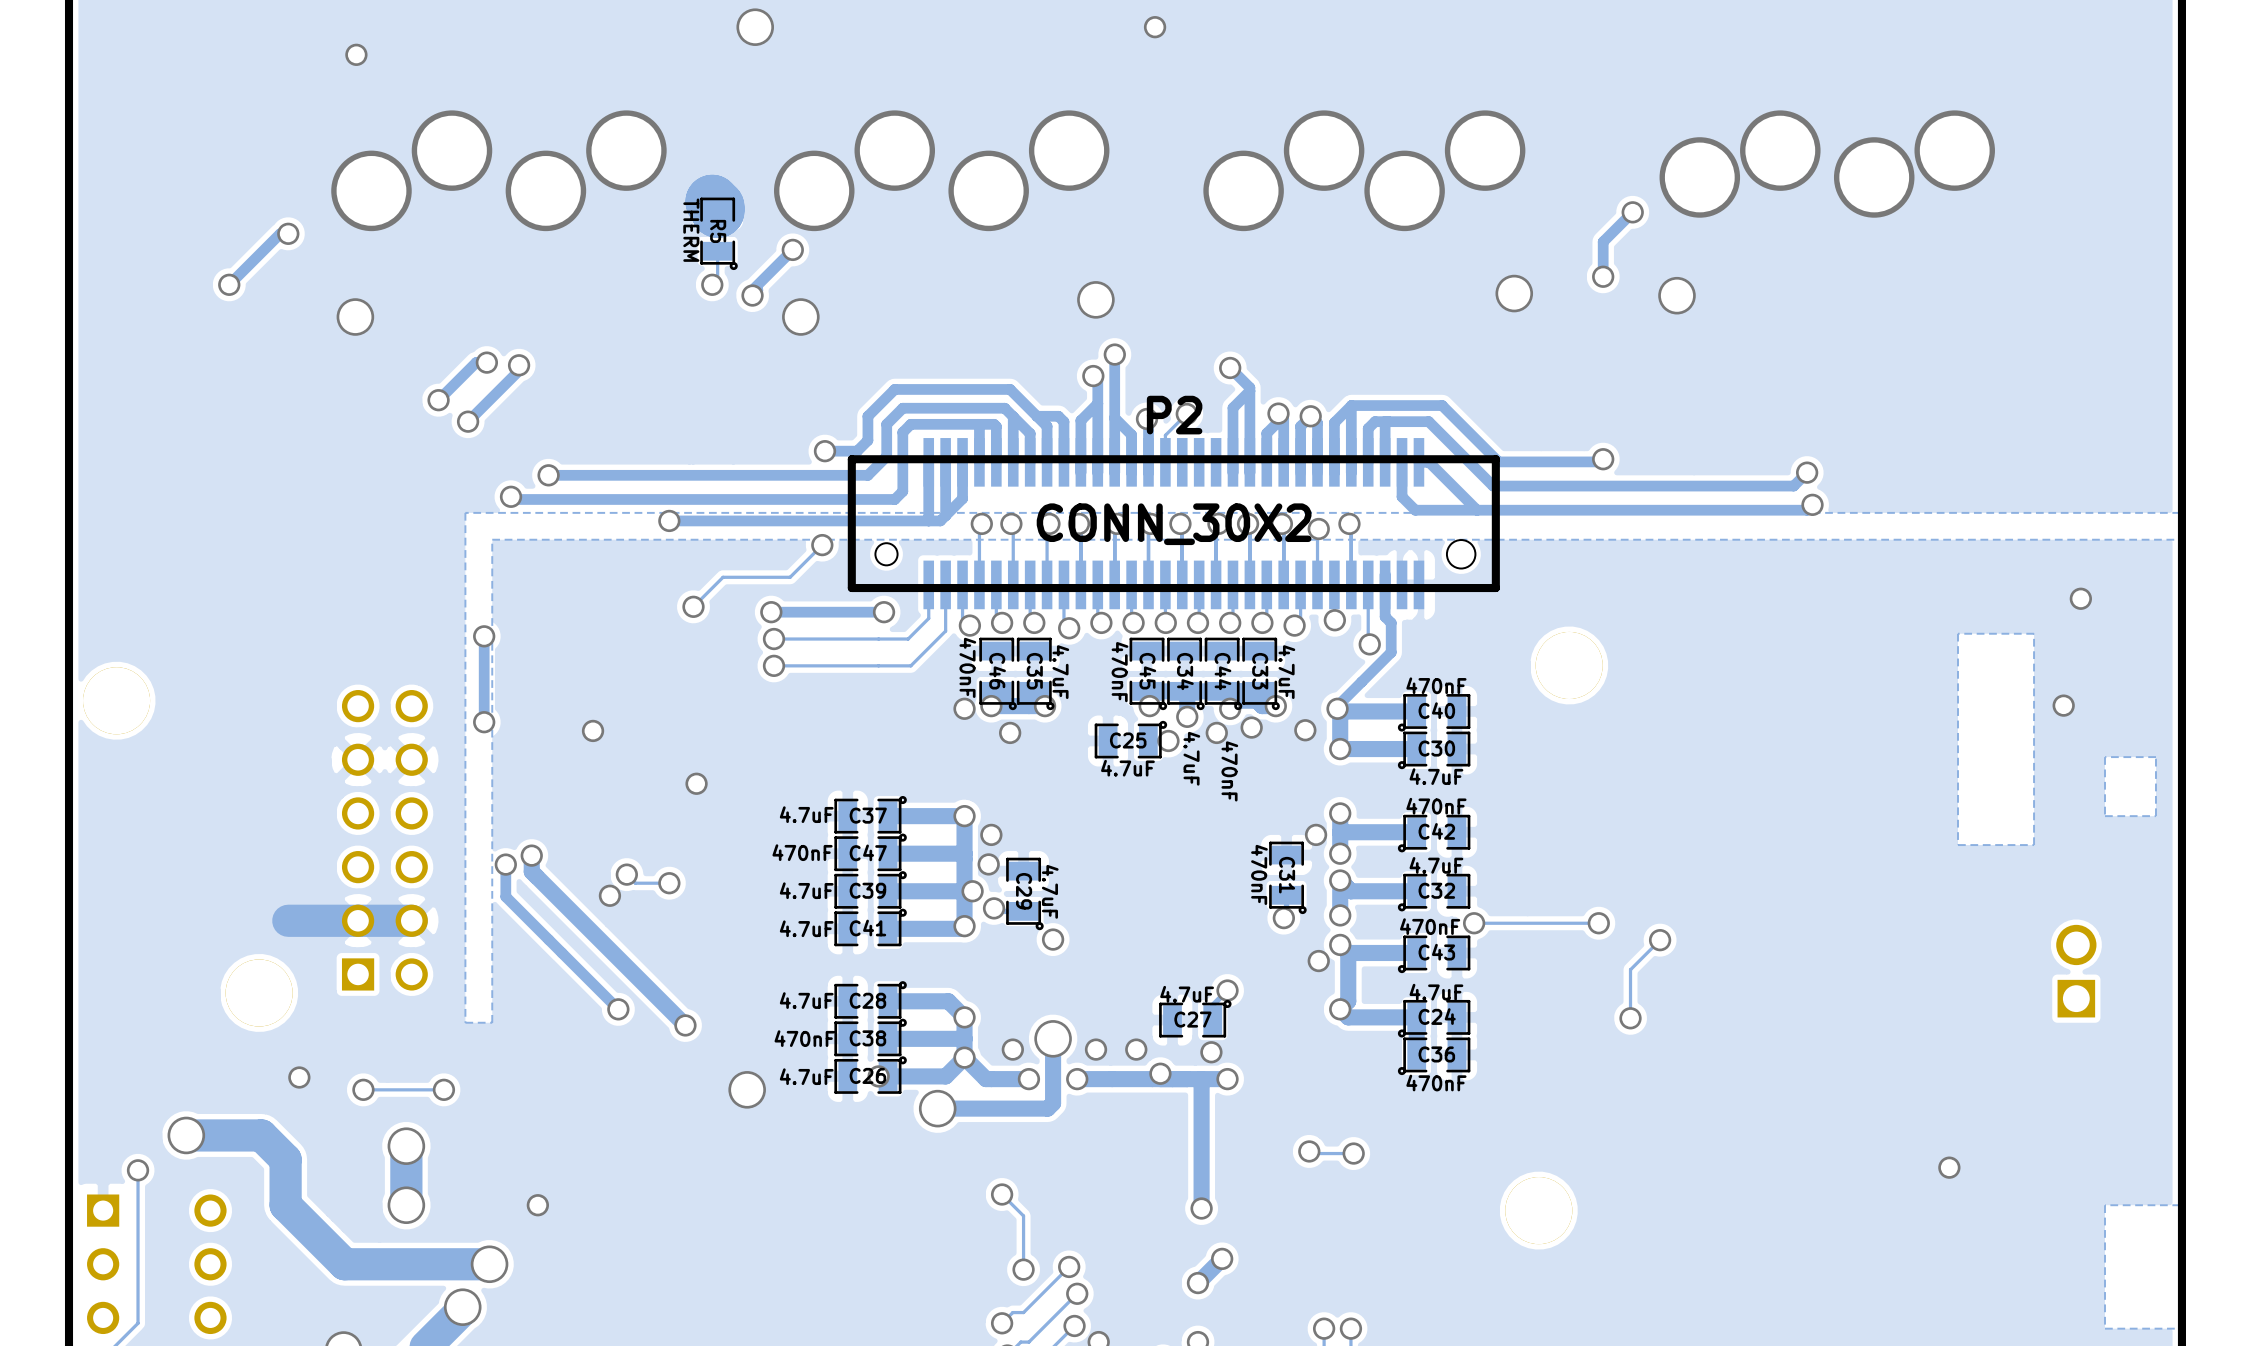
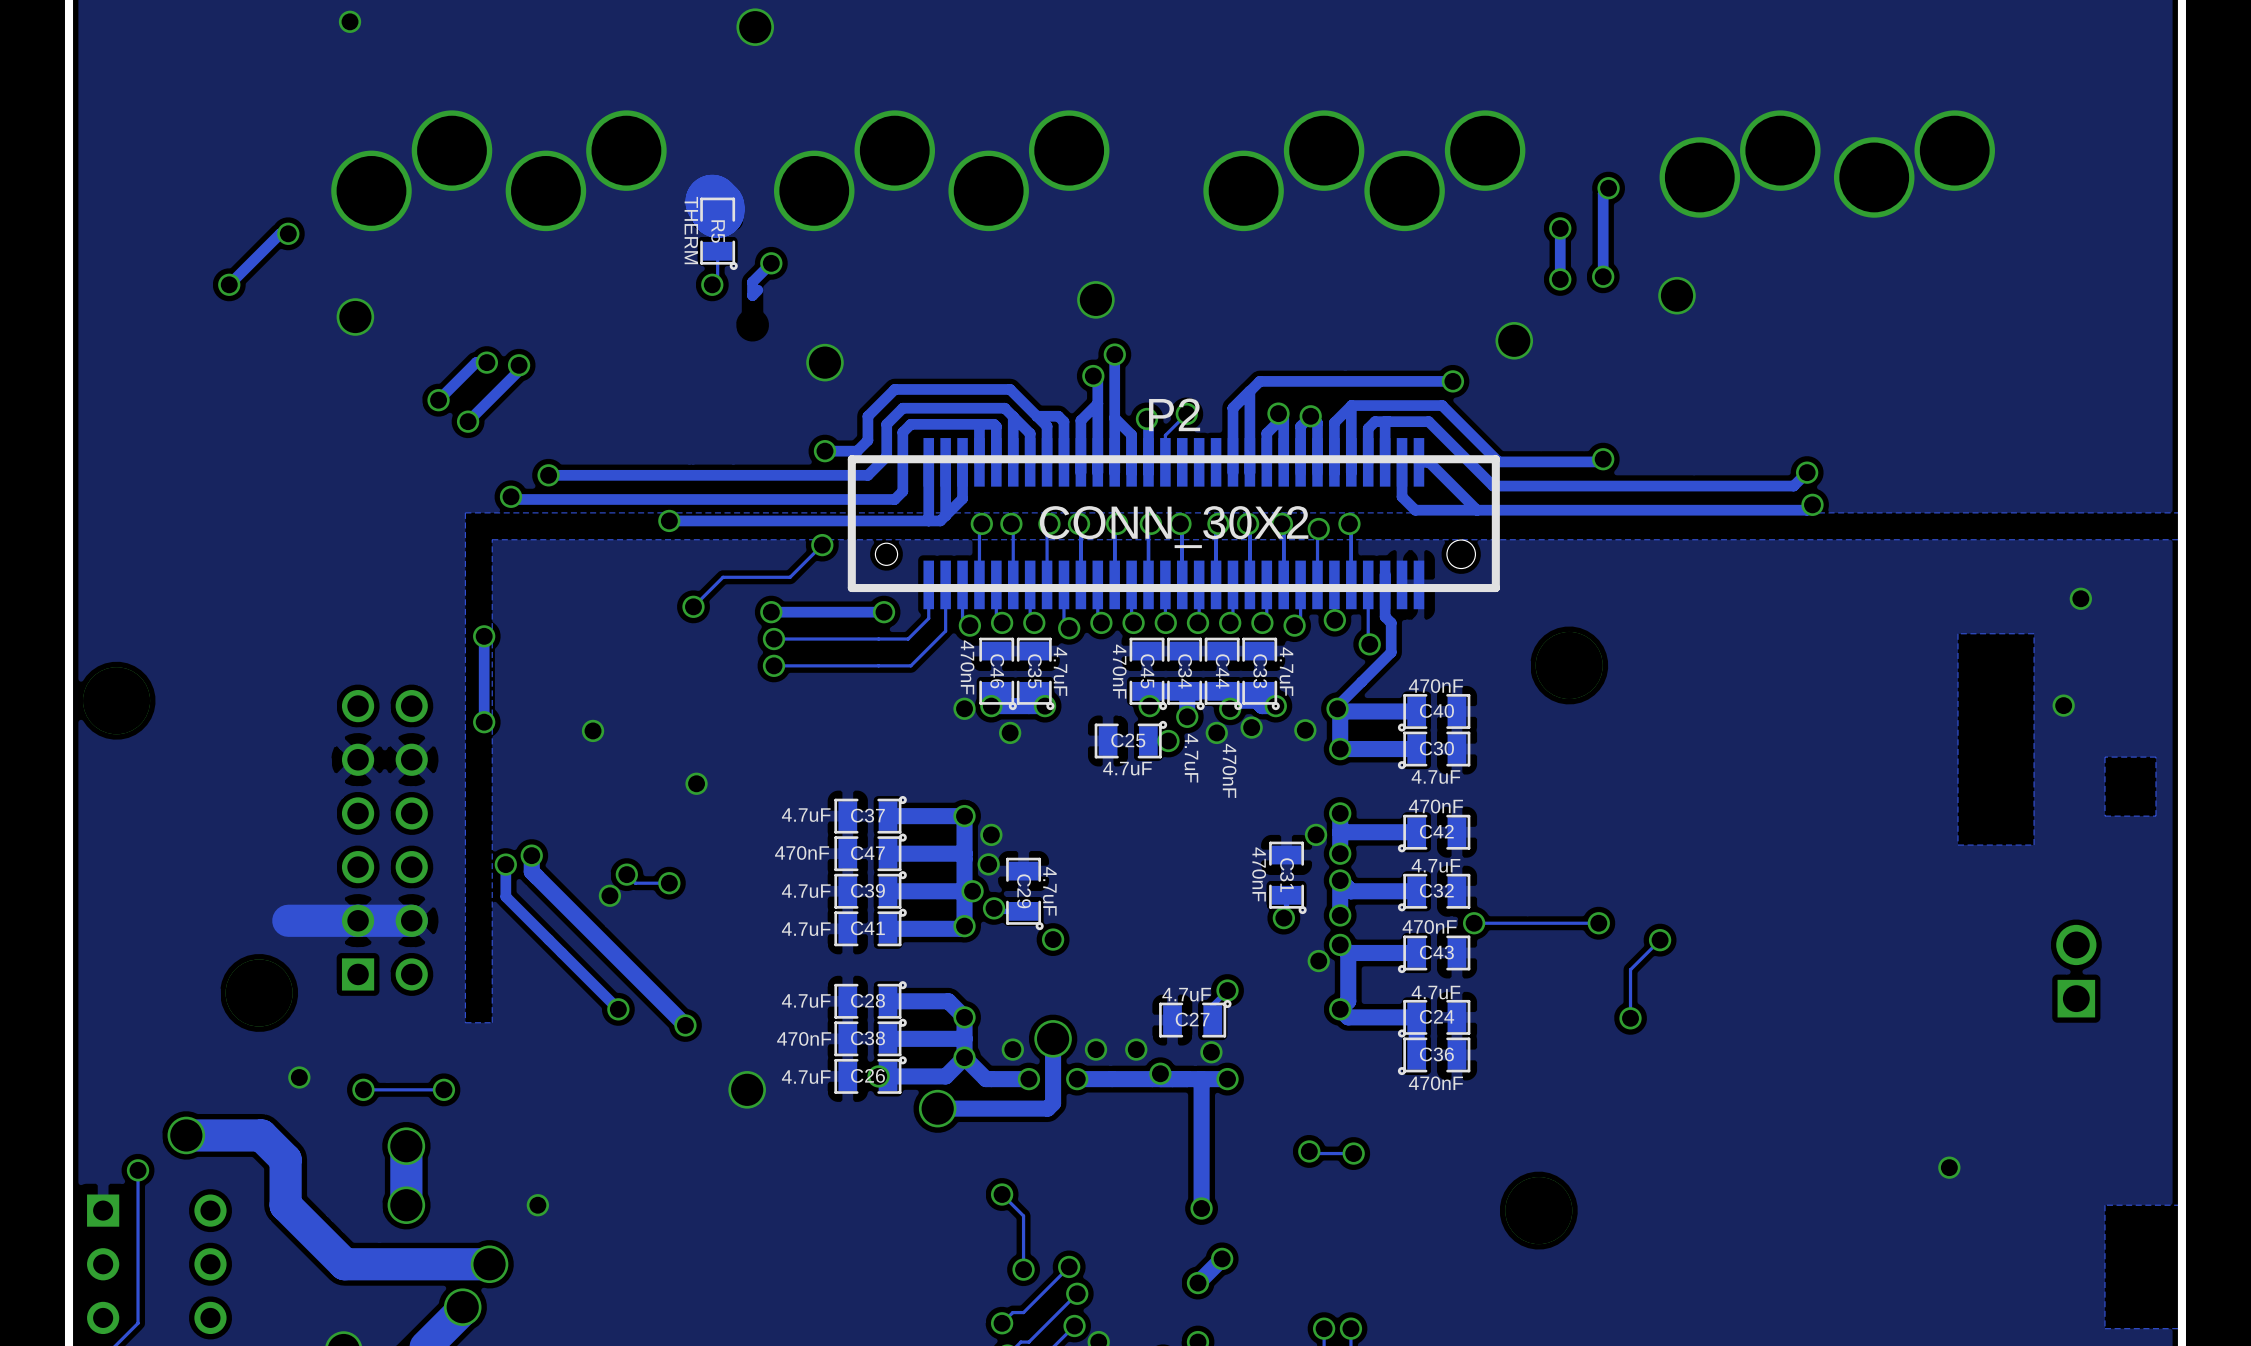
via: (1155, 27) -> none
via position: (356, 54) -> (350, 21)
track: (1632, 212) (1603, 241) -> (1608, 188) (1603, 193) (1603, 241)
via position: (1632, 212) -> (1608, 188)
track: none -> (1560, 228) (1560, 279)
via: none -> (1560, 228)
track: (792, 249) (752, 290) -> (771, 263) (752, 282) (752, 290)
via: (792, 249) -> none
via: none -> (771, 263)
via: none -> (1560, 279)
via position: (1514, 293) -> (1514, 340)
via: (752, 295) -> none
via position: (800, 317) -> (824, 362)
track: (1230, 367) (1249, 387) (1249, 391) -> none
via: (1230, 367) -> none
track: none -> (1452, 381) (1259, 381) (1232, 408)
via: none -> (1452, 381)

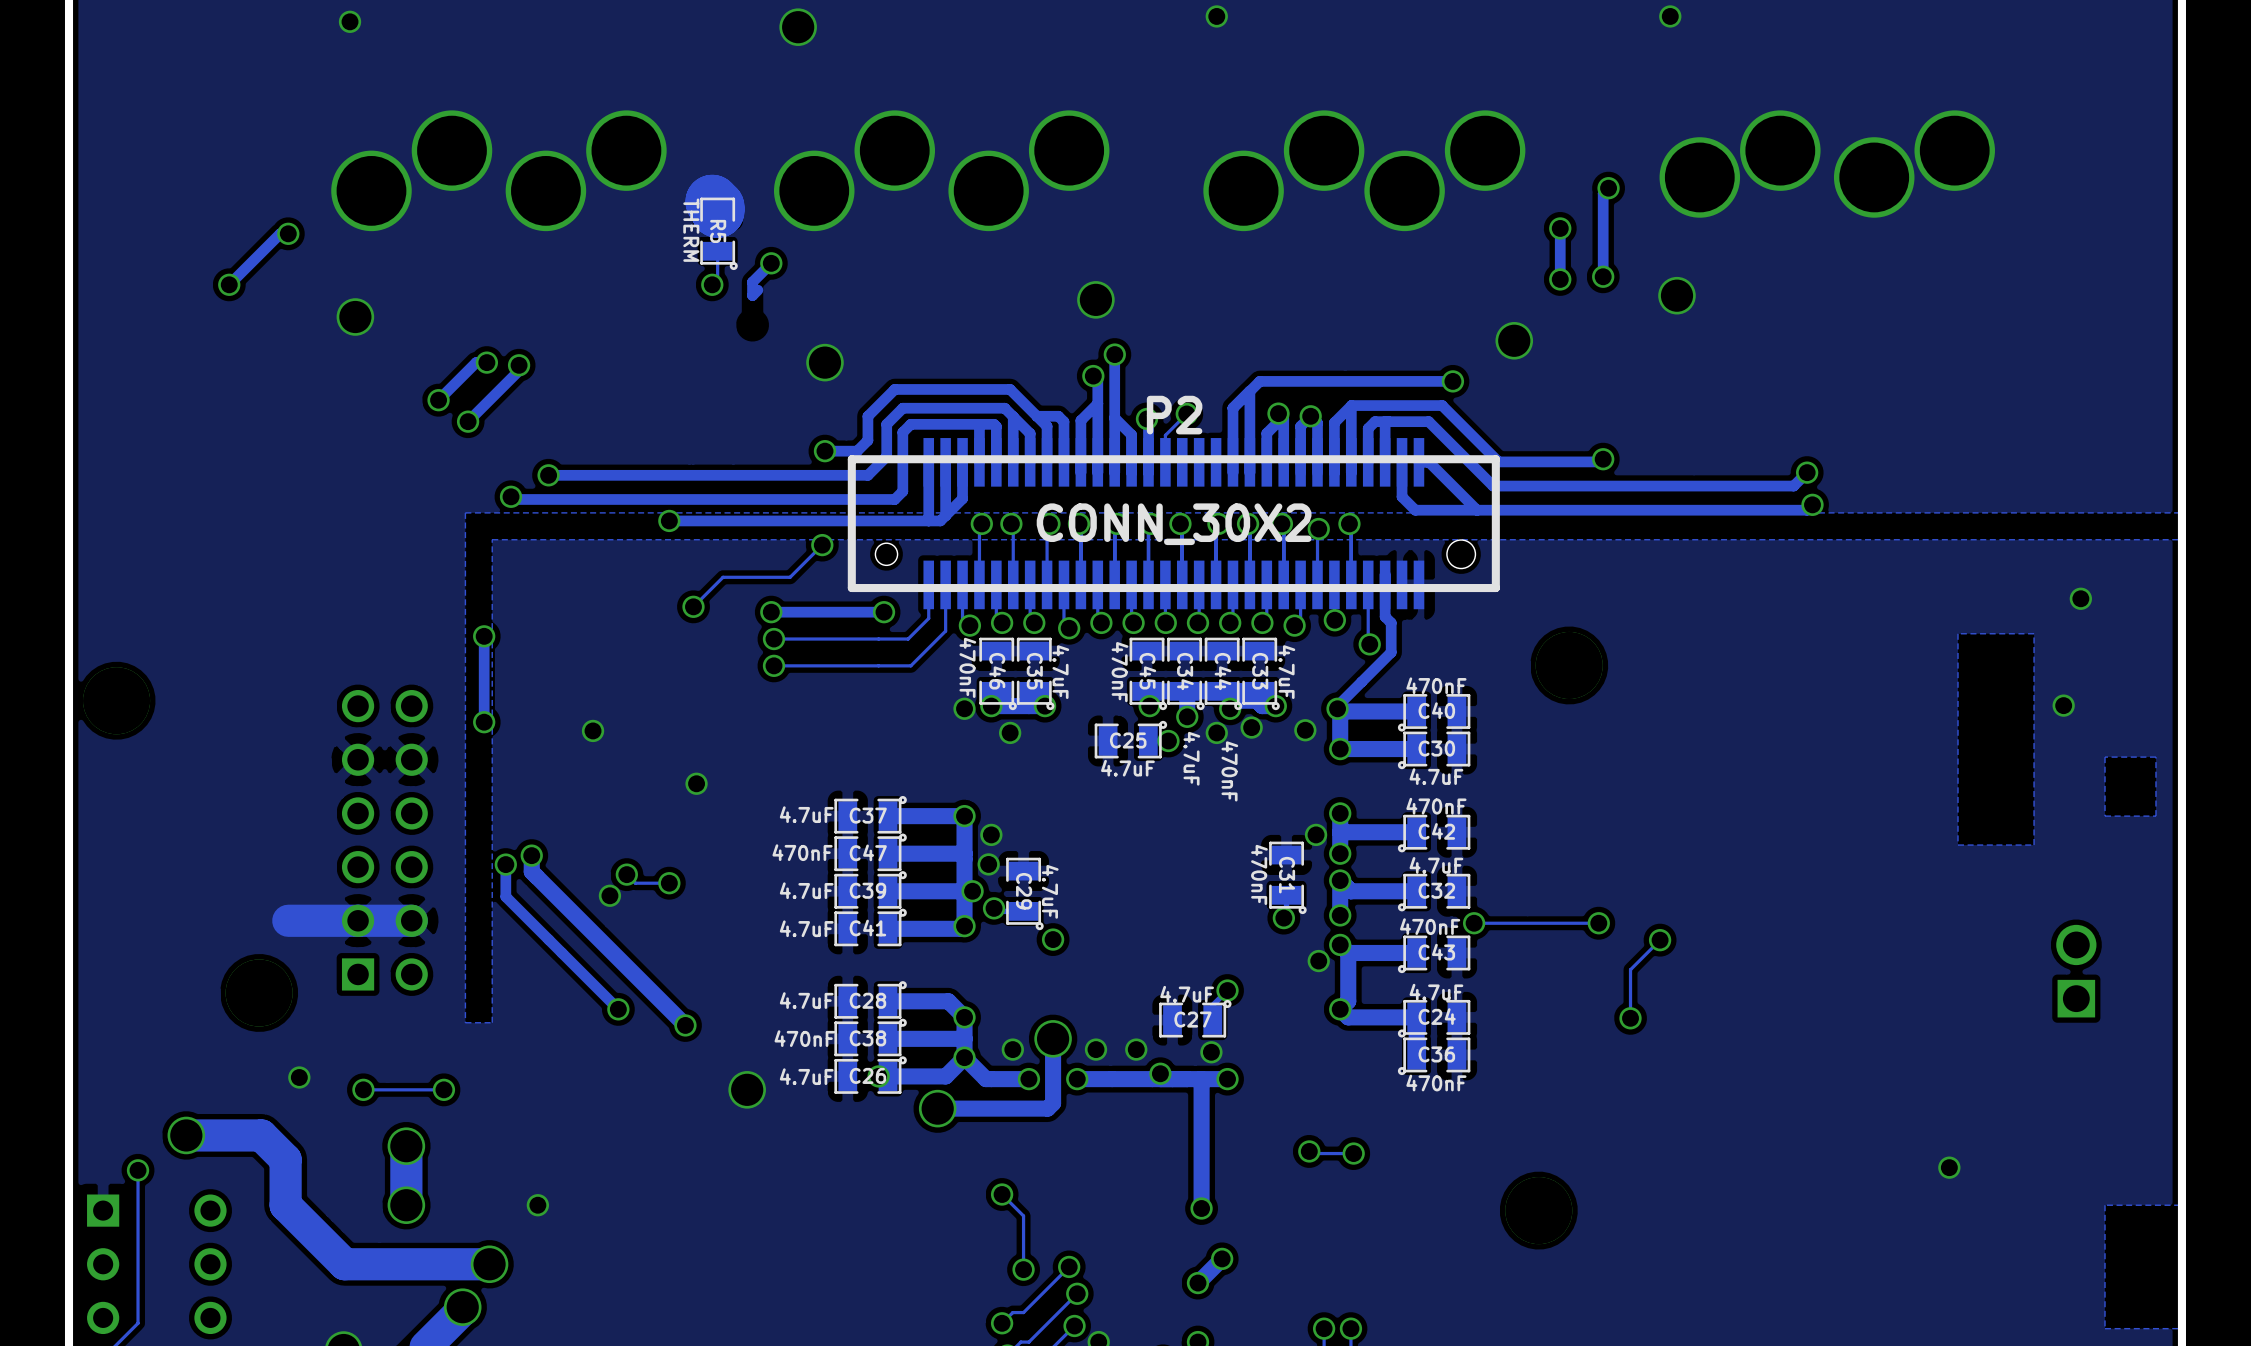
via: none -> (1216, 16)
via: none -> (1670, 16)
via position: (755, 27) -> (798, 27)

